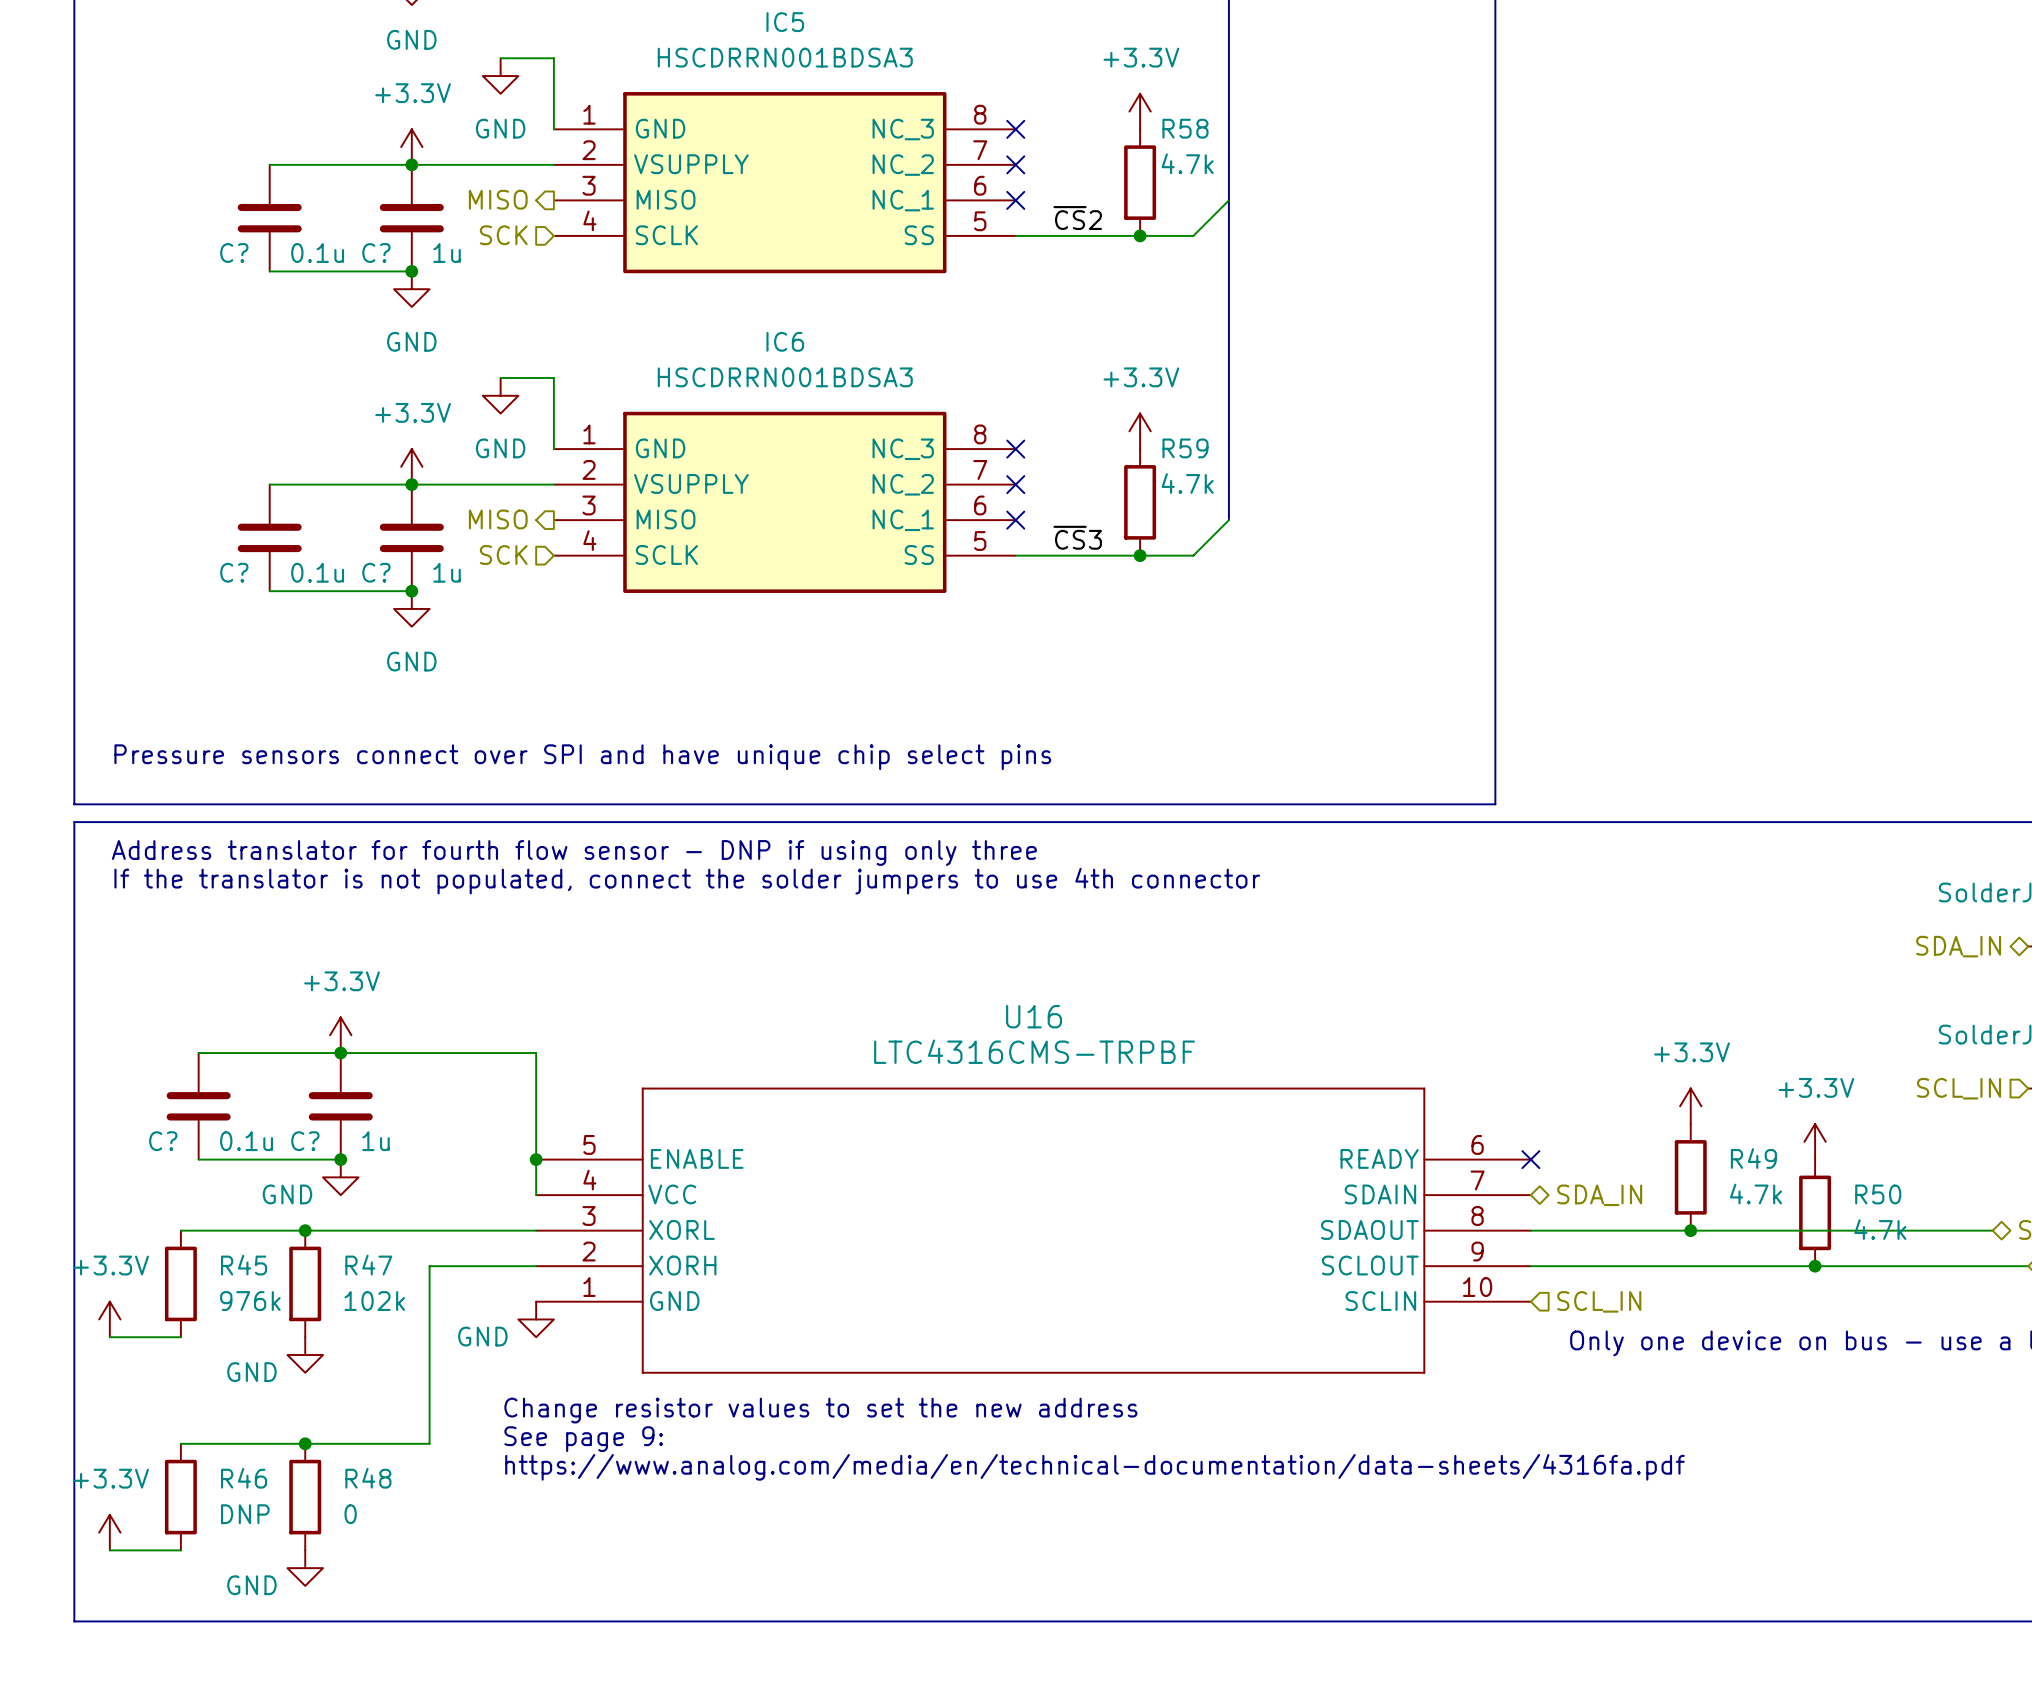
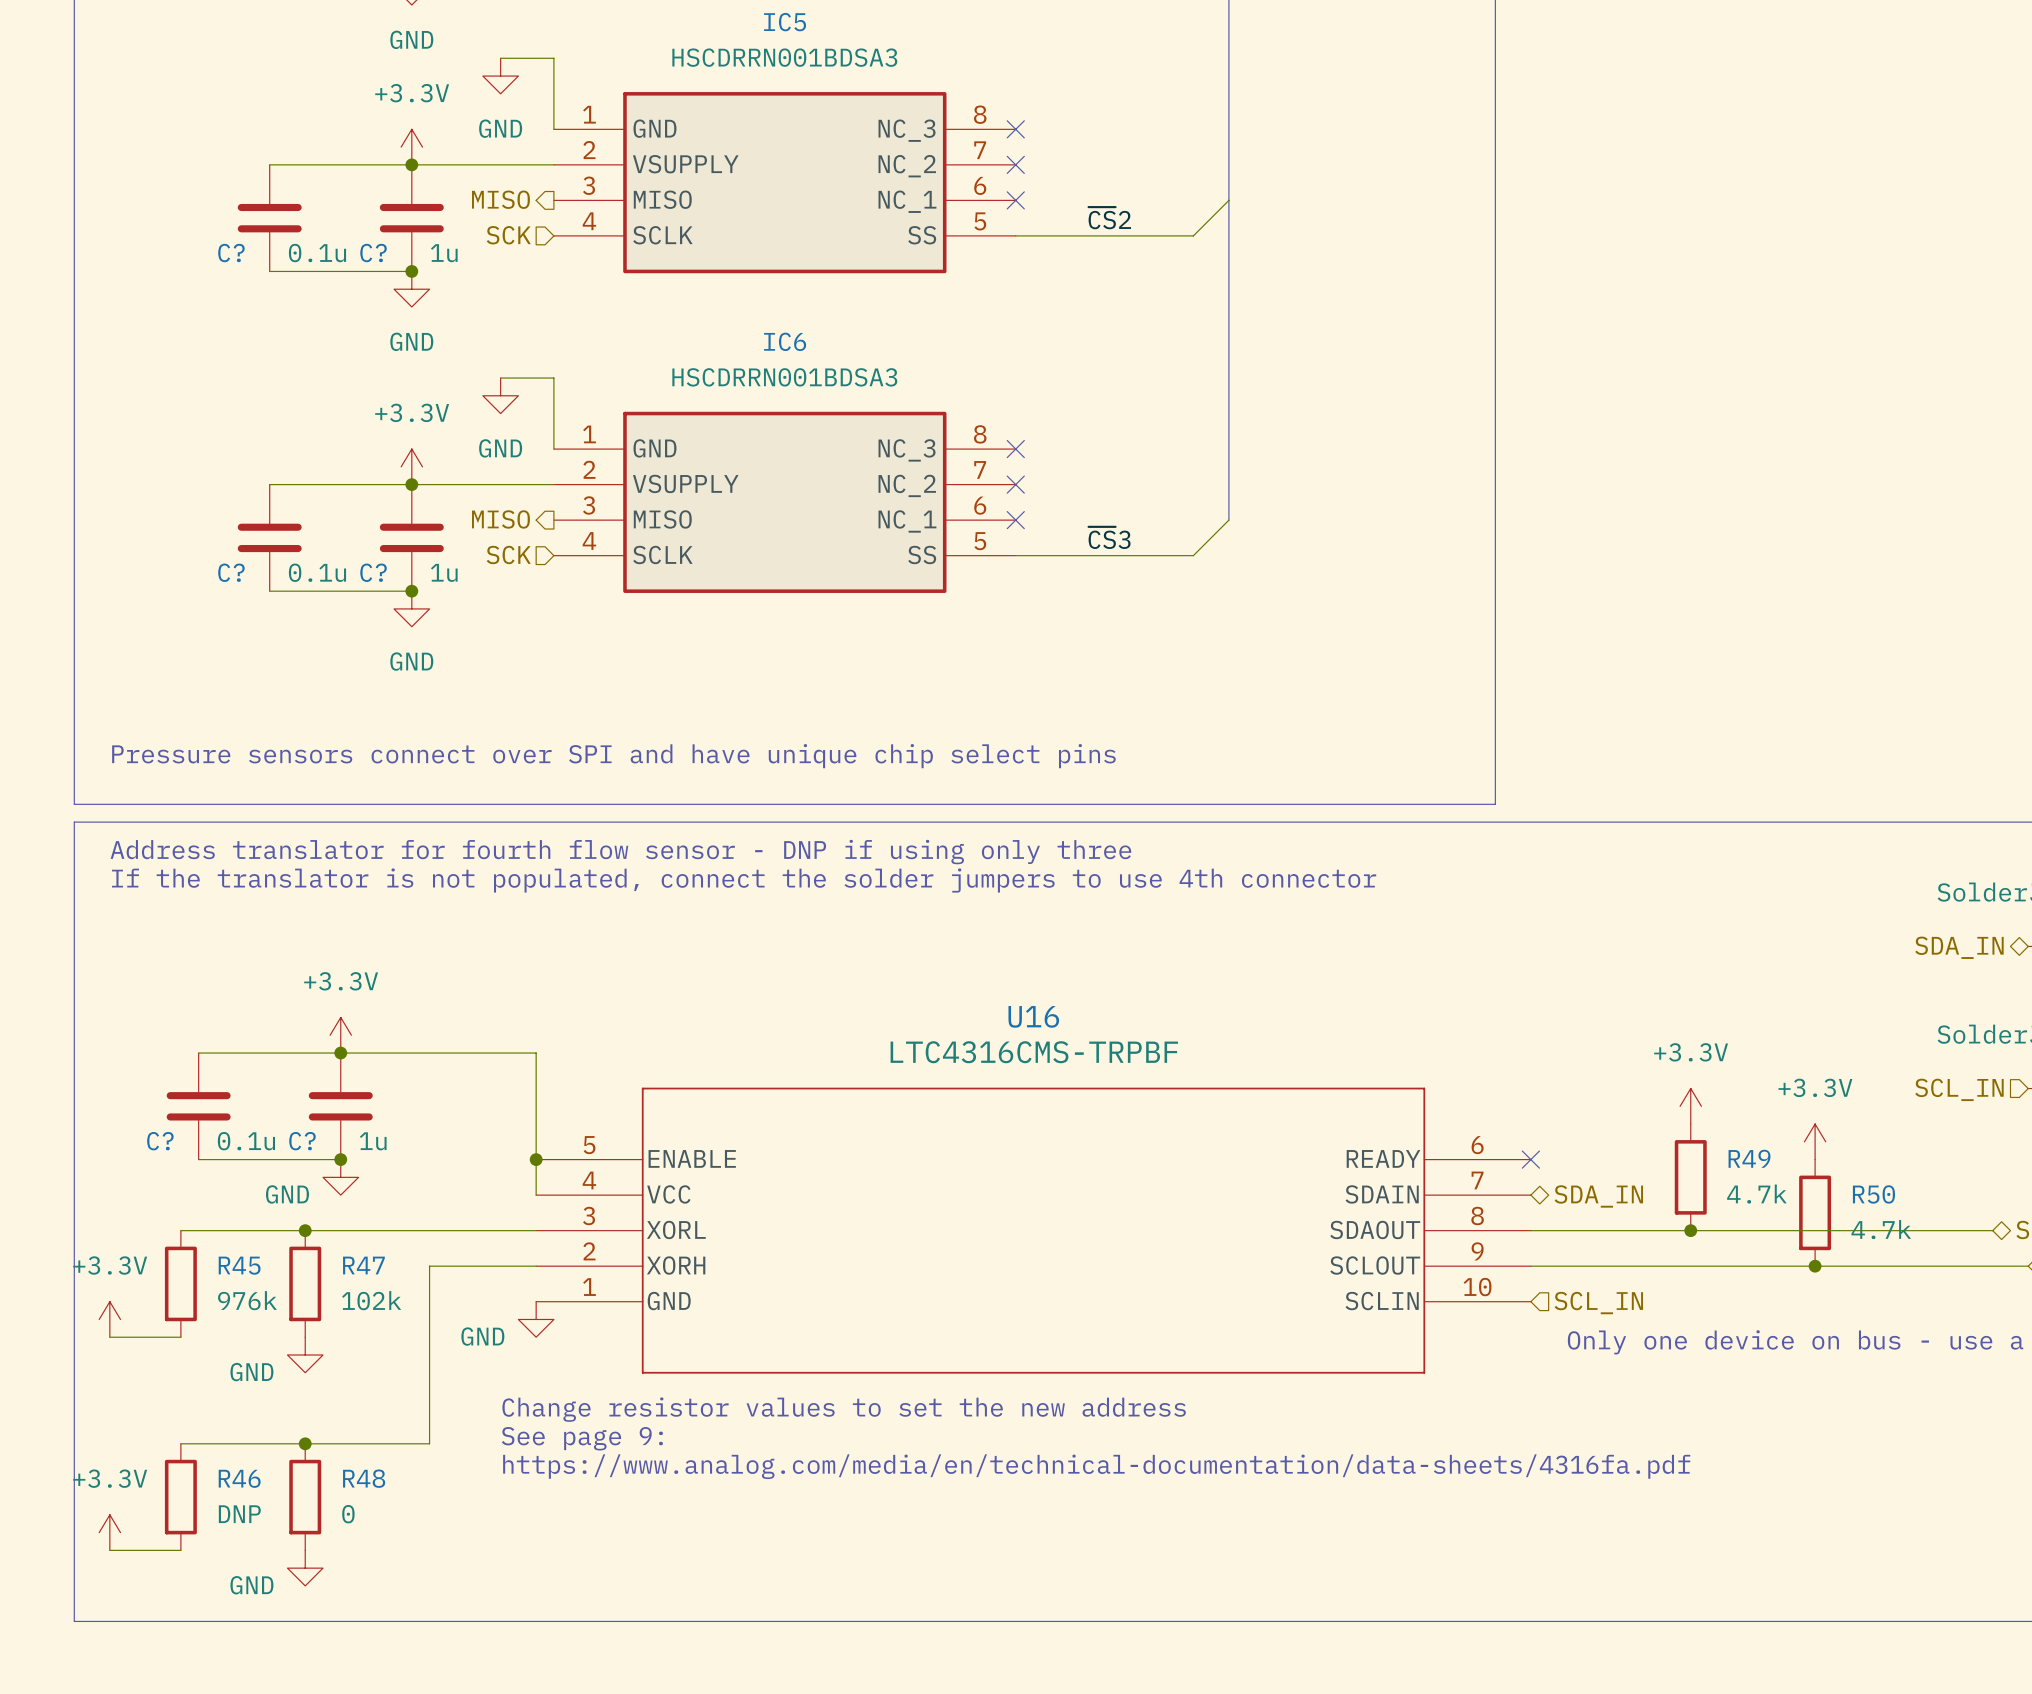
power symbol: +3.3V (1140, 111) -> none
R58: 4.7k (1140, 182) -> none
label position: ~{CS}2 (1077, 218) -> ~{CS}2 (1109, 218)
junction: (1140, 235) -> none
power symbol: +3.3V (1140, 431) -> none
R59: 4.7k (1140, 502) -> none
label position: ~{CS}3 (1077, 537) -> ~{CS}3 (1109, 537)
junction: (1140, 555) -> none

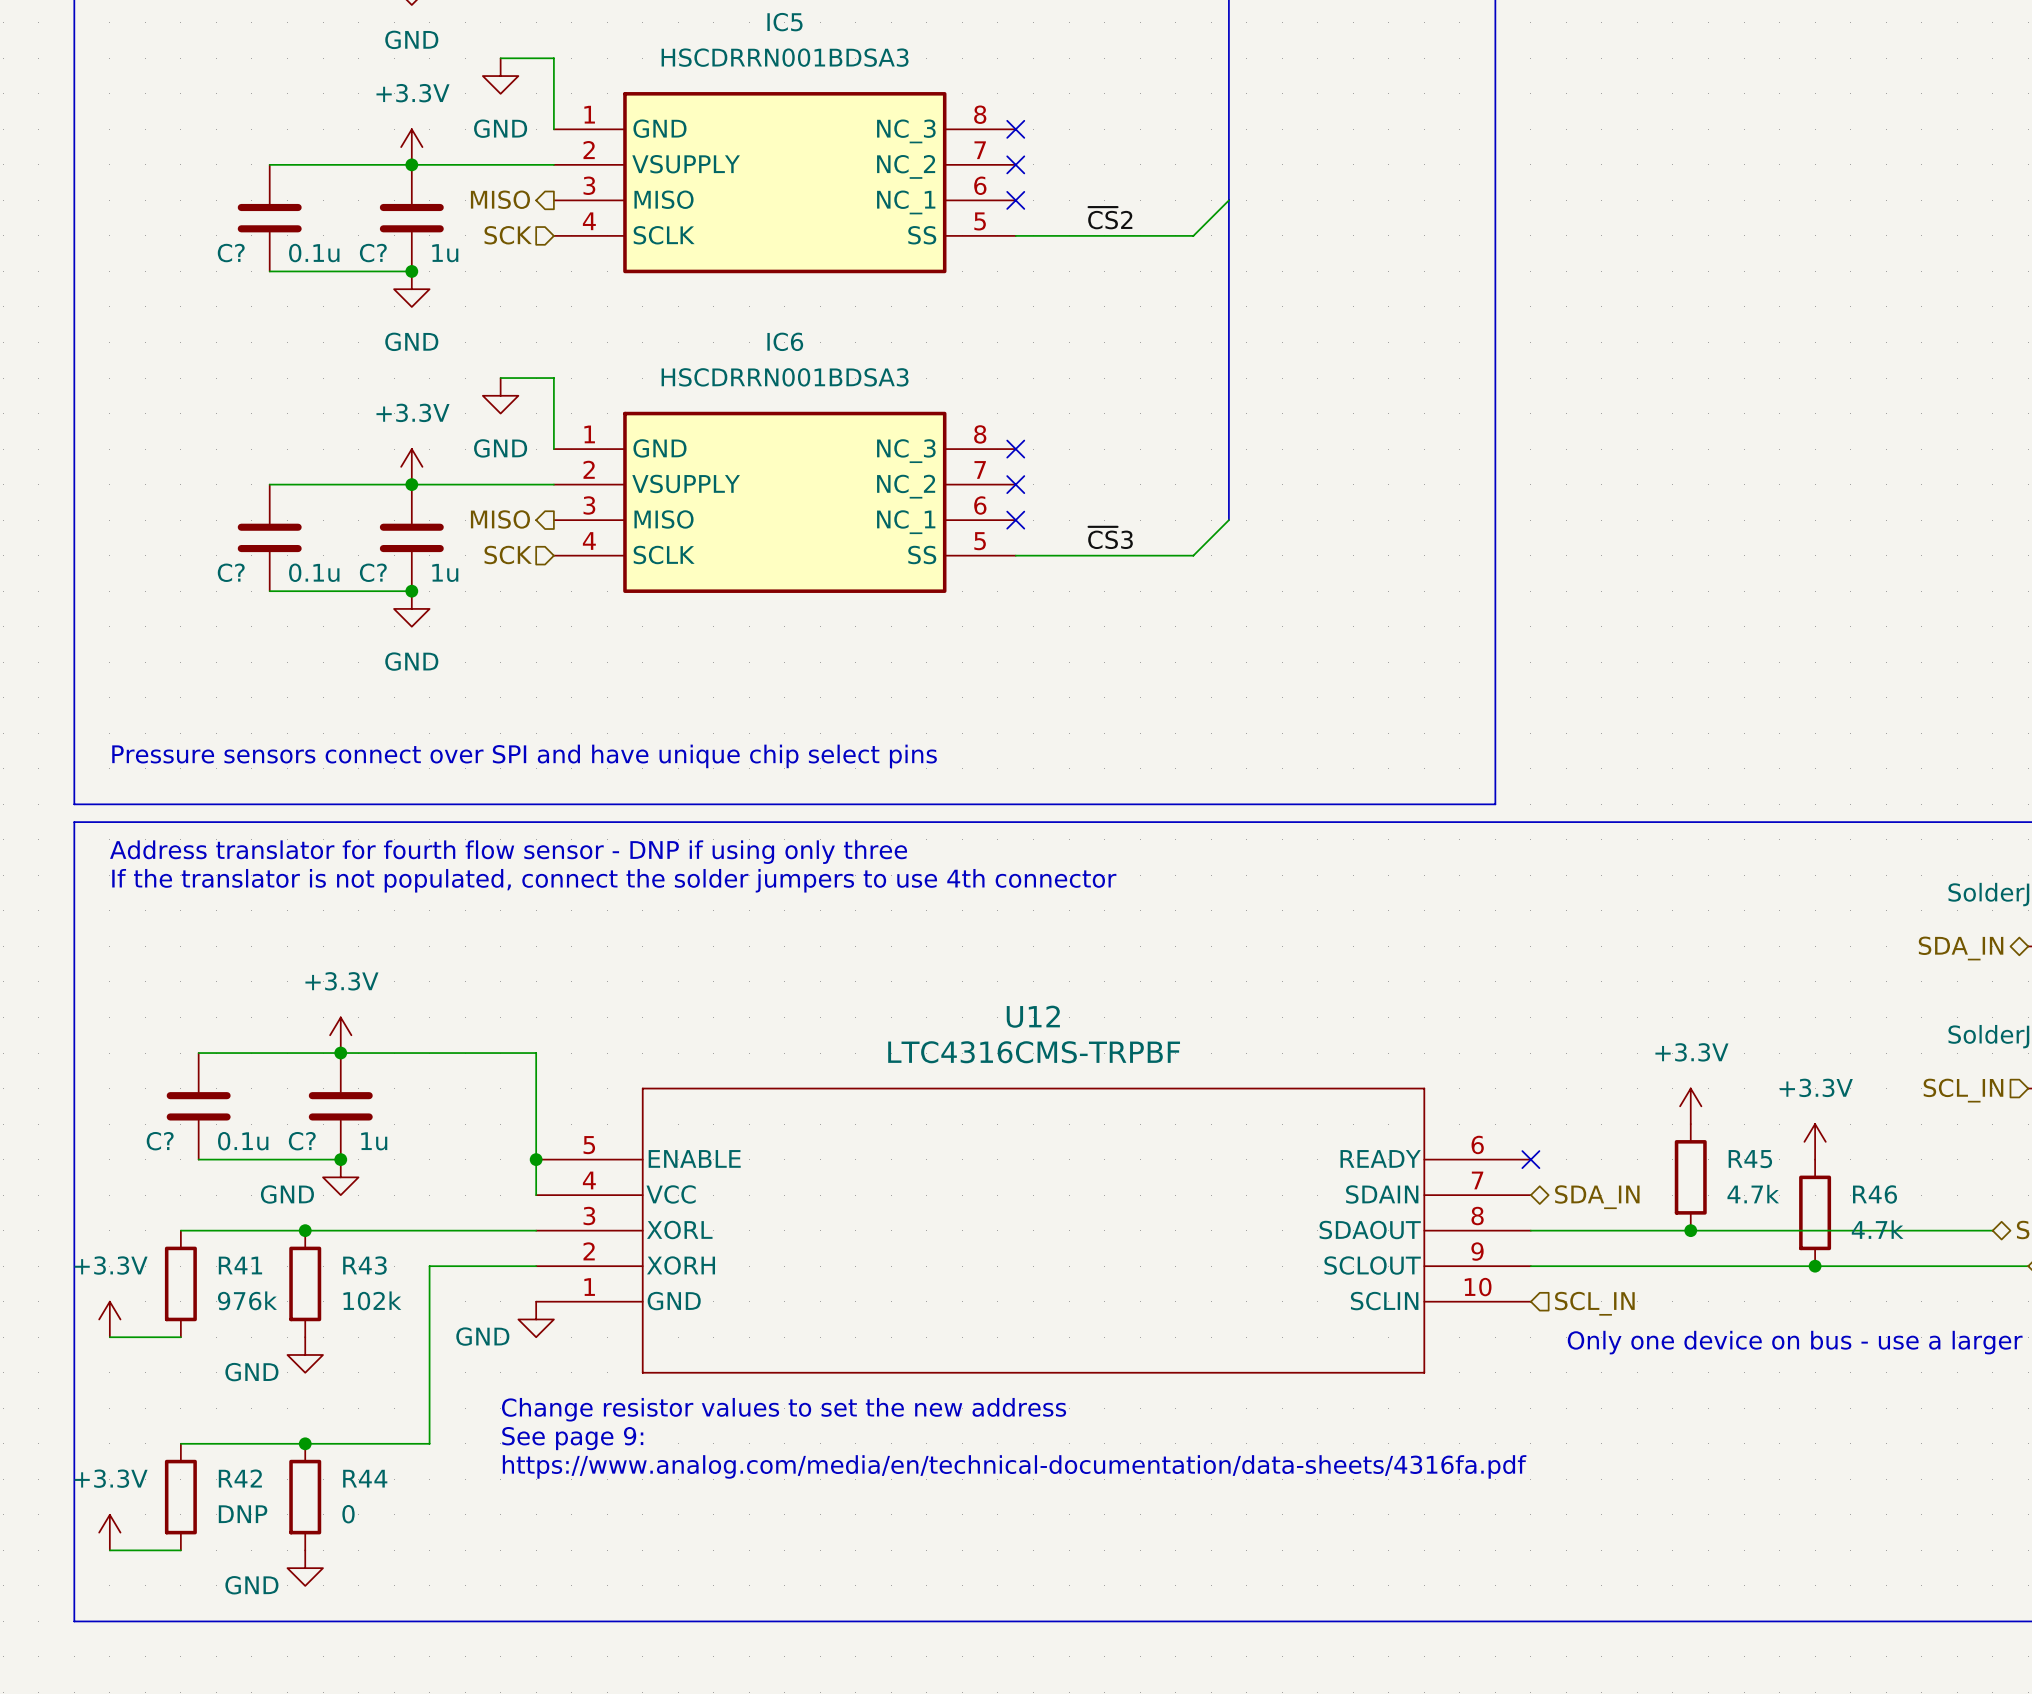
U16 name: U16 (1033, 1016) -> U12 (1033, 1016)
R49 name: R49 (1749, 1158) -> R45 (1750, 1159)
R50 name: R50 (1873, 1194) -> R46 (1875, 1194)
R45 name: R45 (239, 1265) -> R41 (240, 1265)
R47 name: R47 (363, 1265) -> R43 (364, 1265)
R46 name: R46 (239, 1478) -> R42 (240, 1478)
R48 name: R48 (364, 1478) -> R44 (365, 1478)

